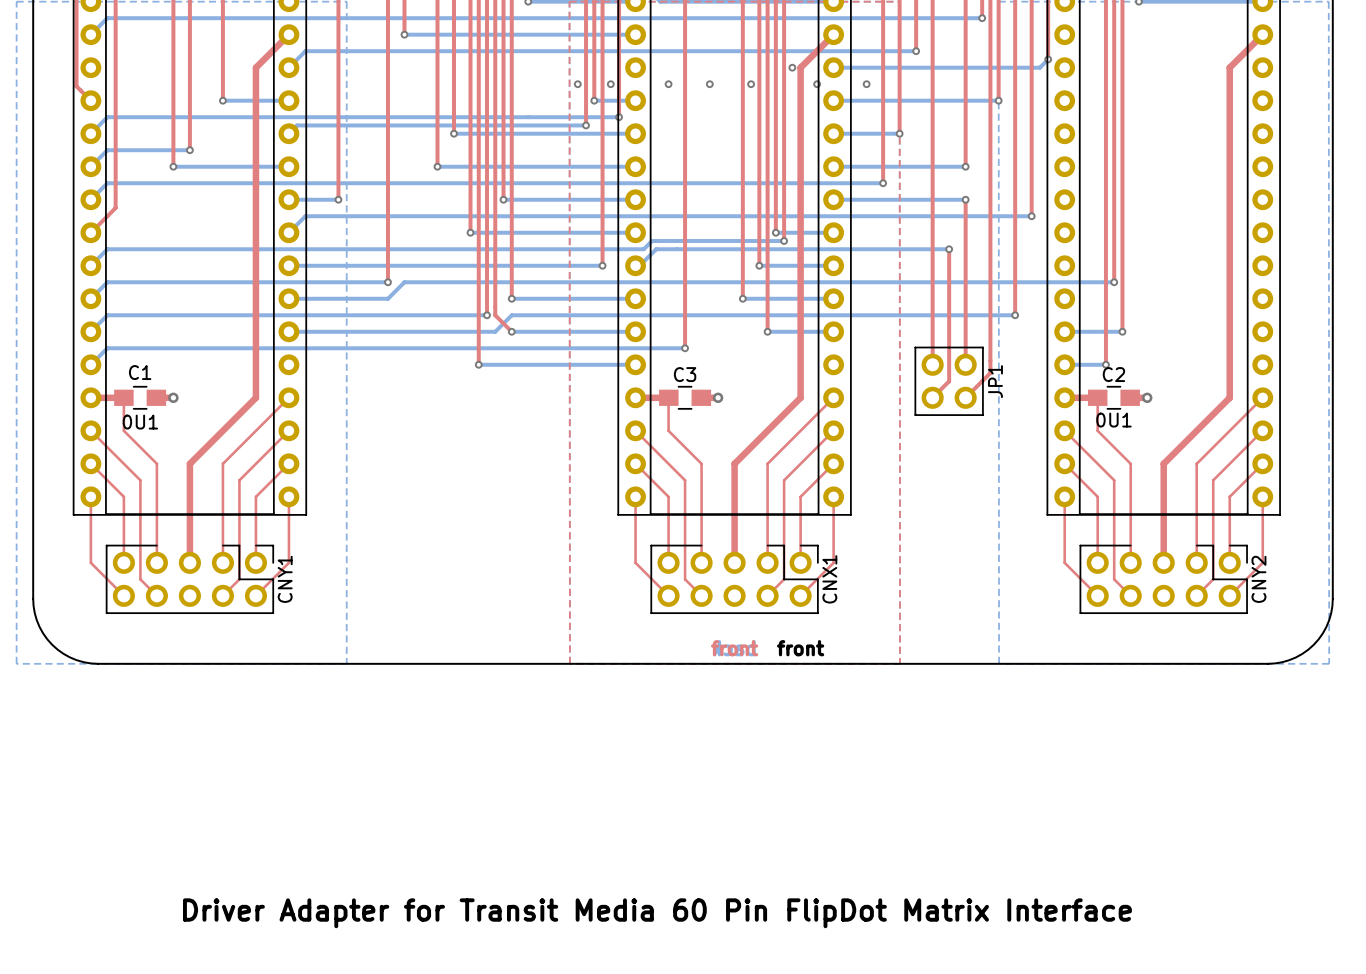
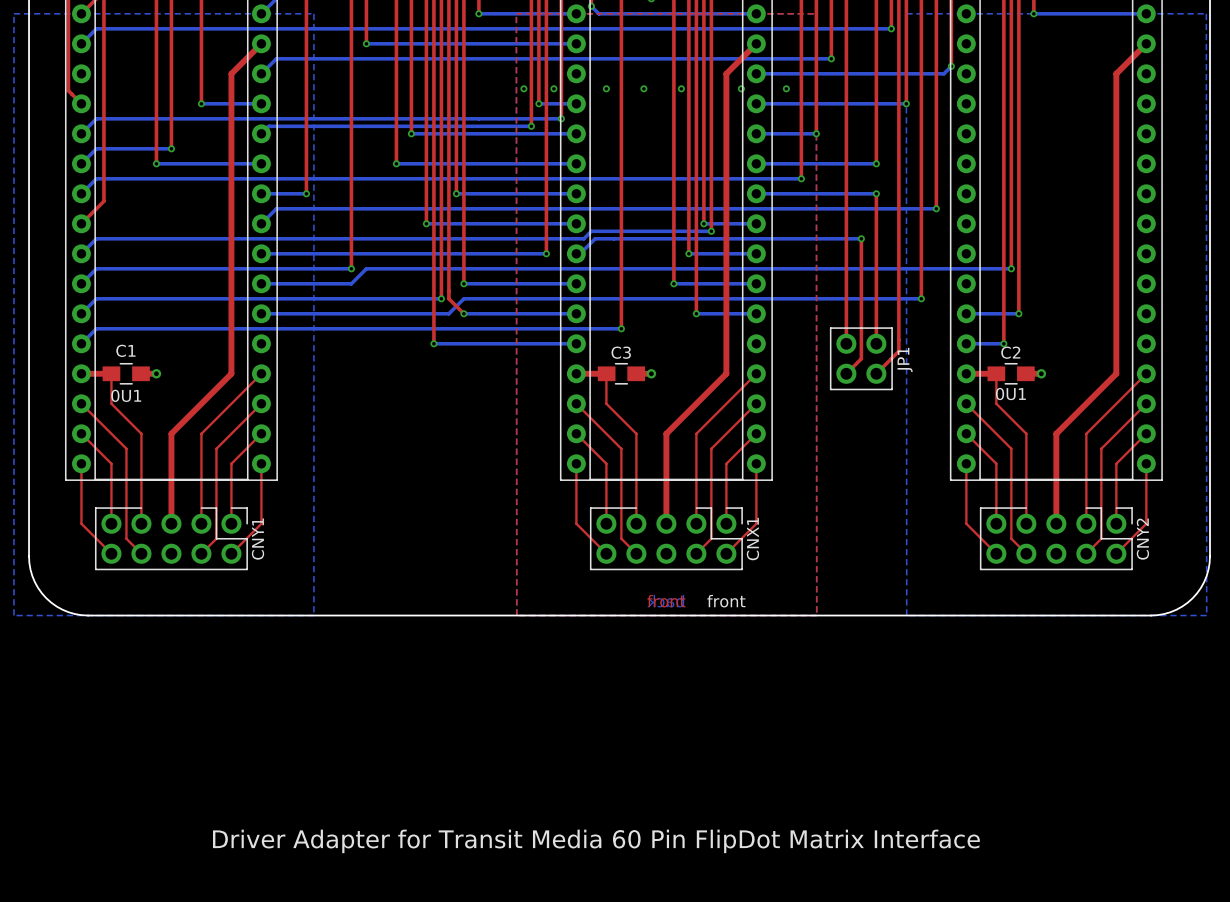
via: (792, 67) -> none

